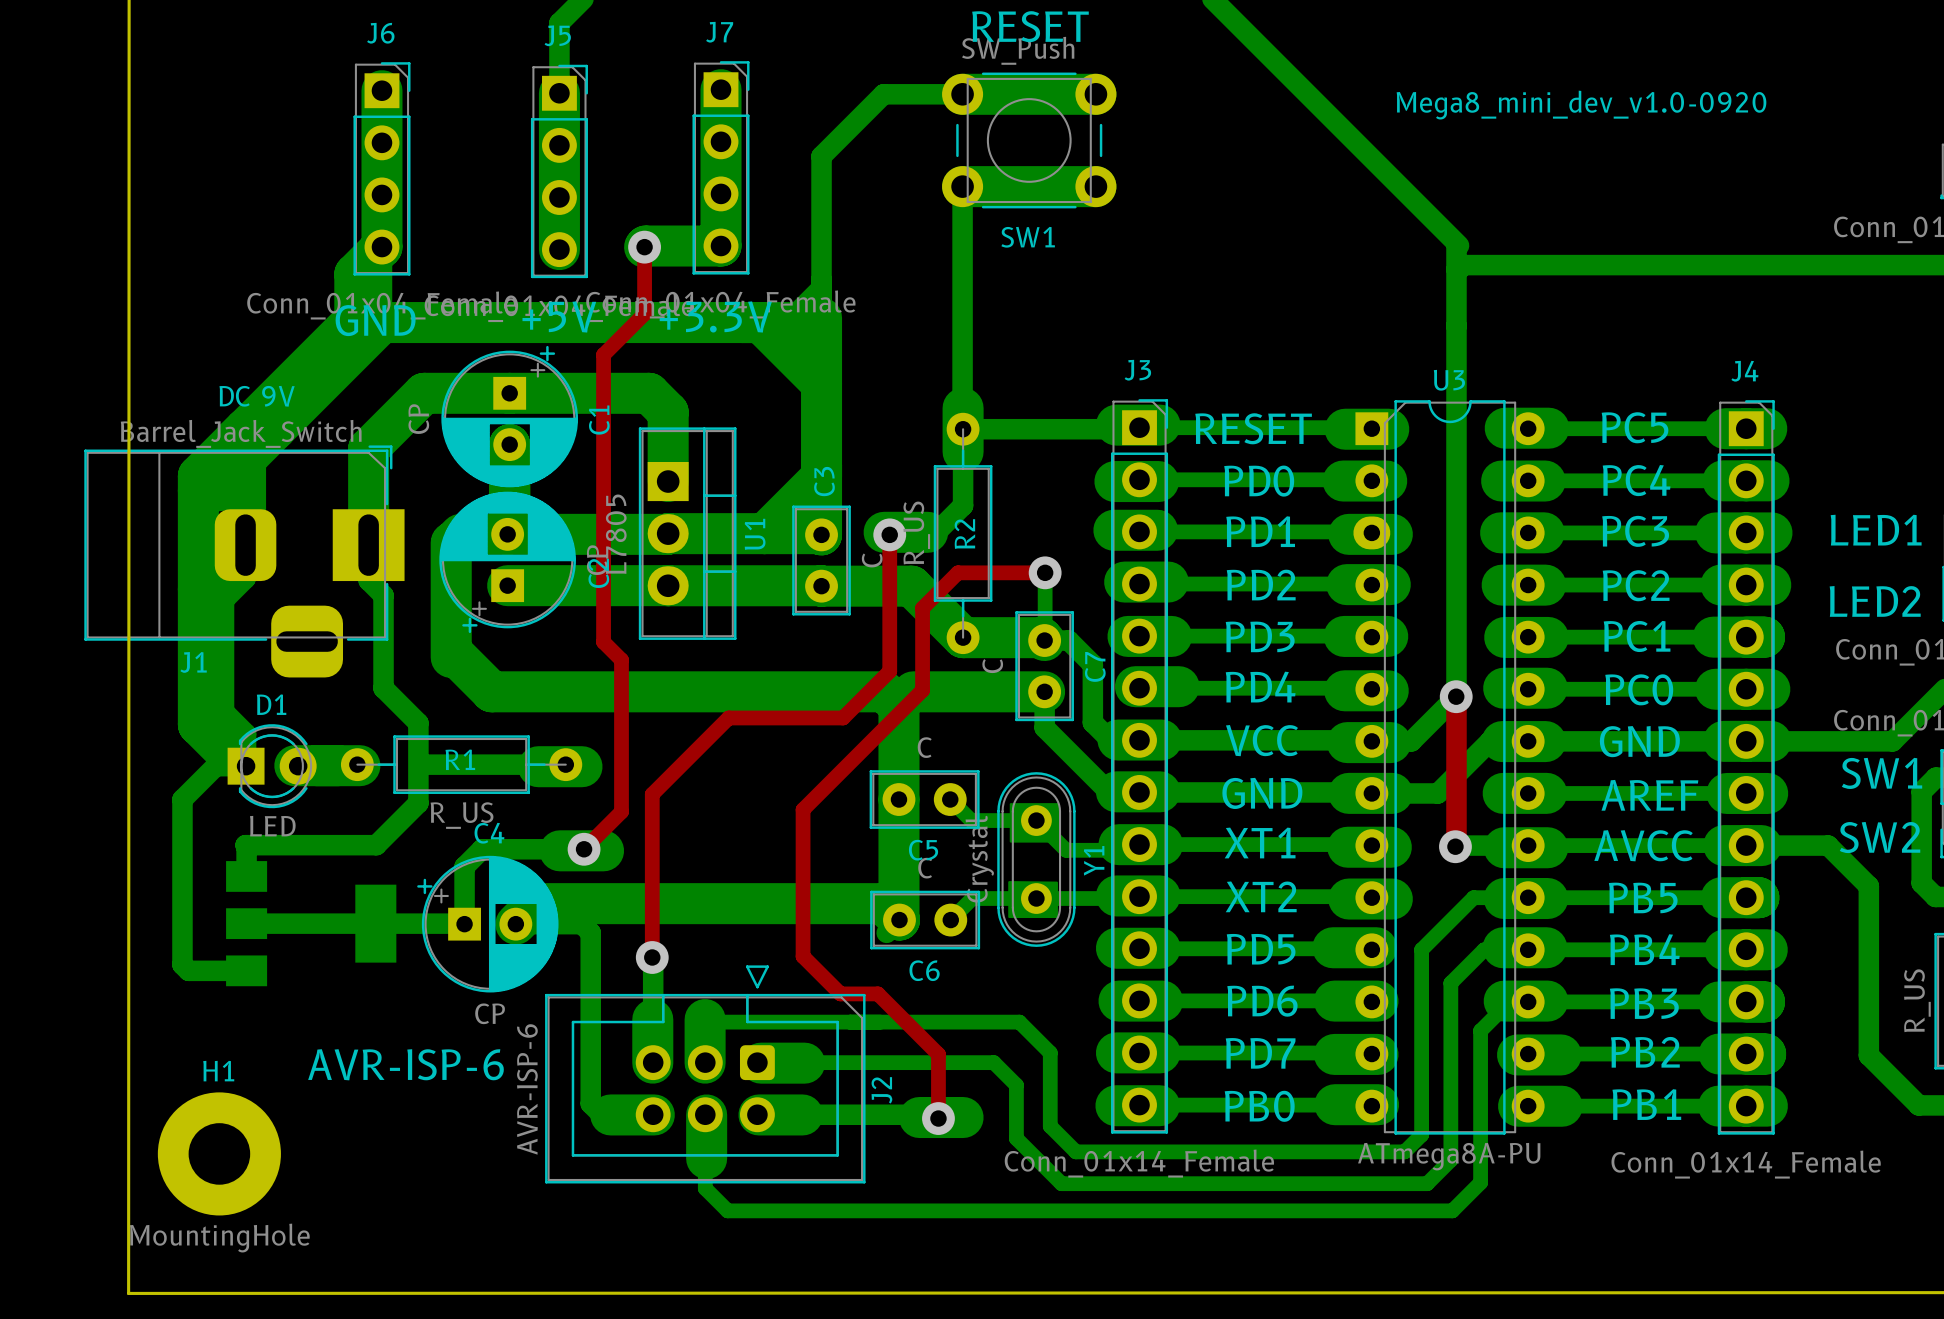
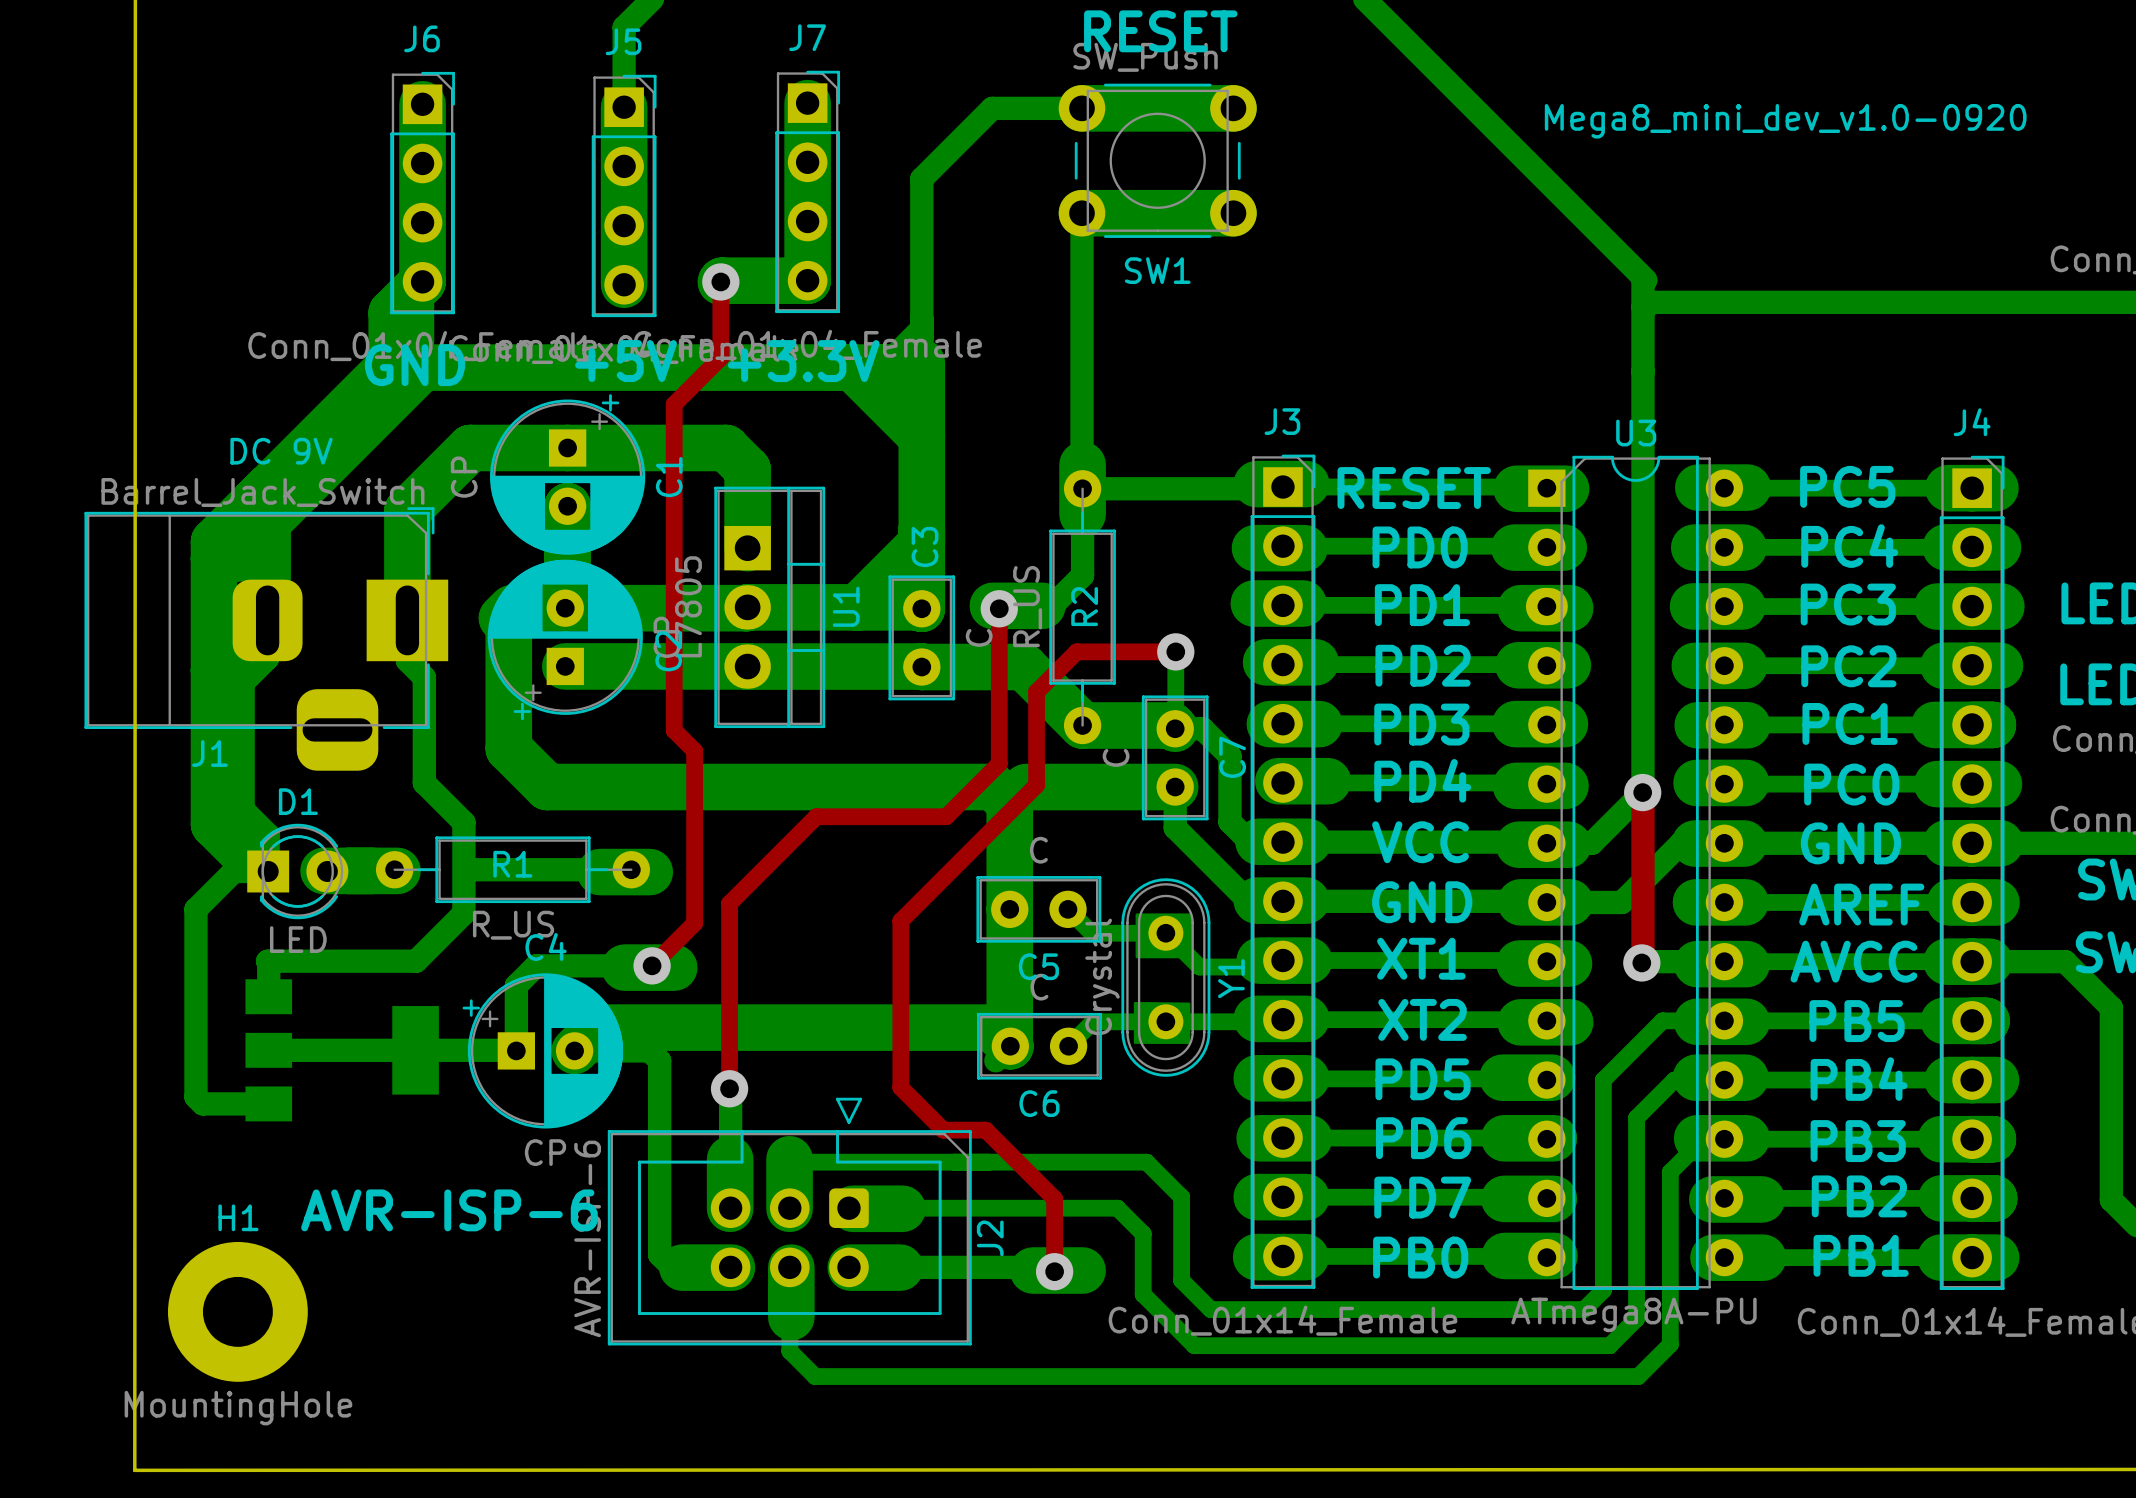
bottom track: none -> (518, 608) (508, 618) (508, 748)
bottom track: (451, 542) (451, 657) -> none

